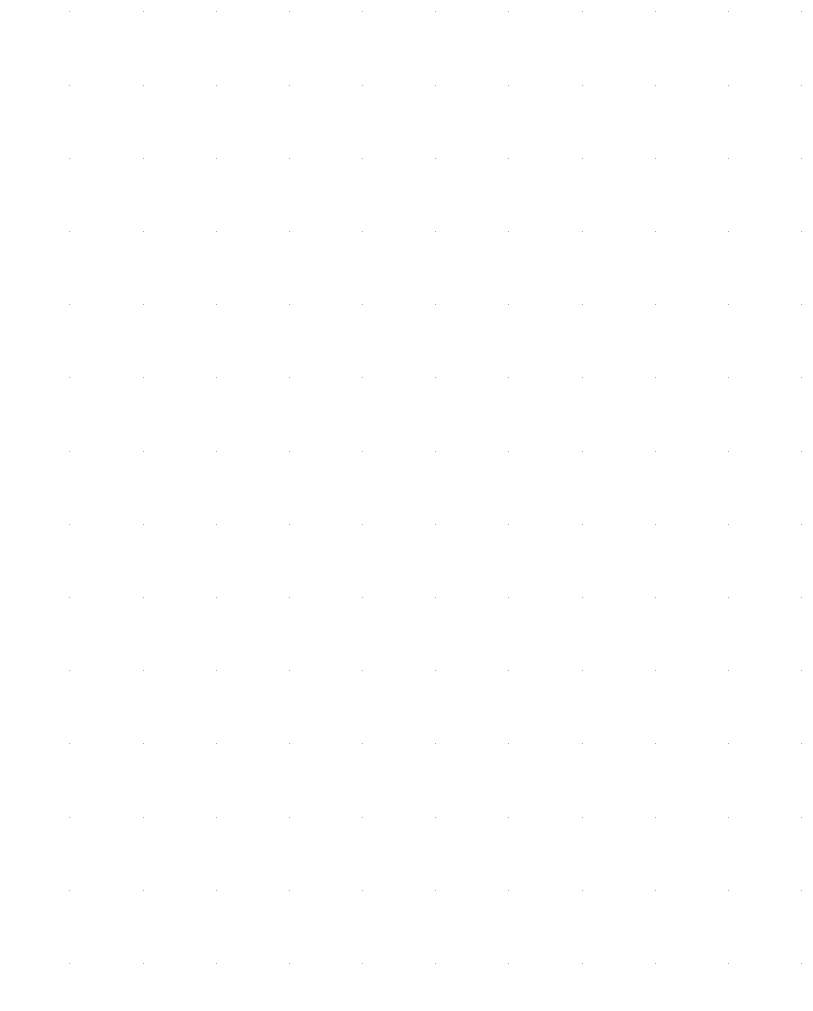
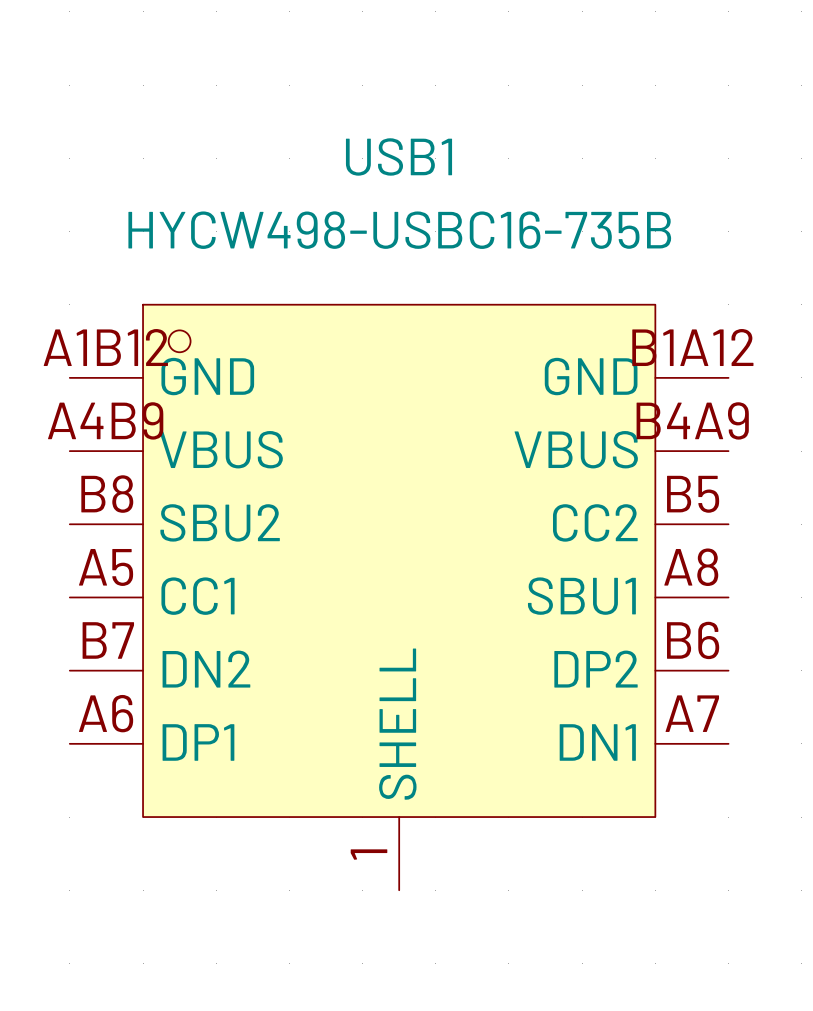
USB1: none -> HYCW498-USBC16-735B (399, 597)

